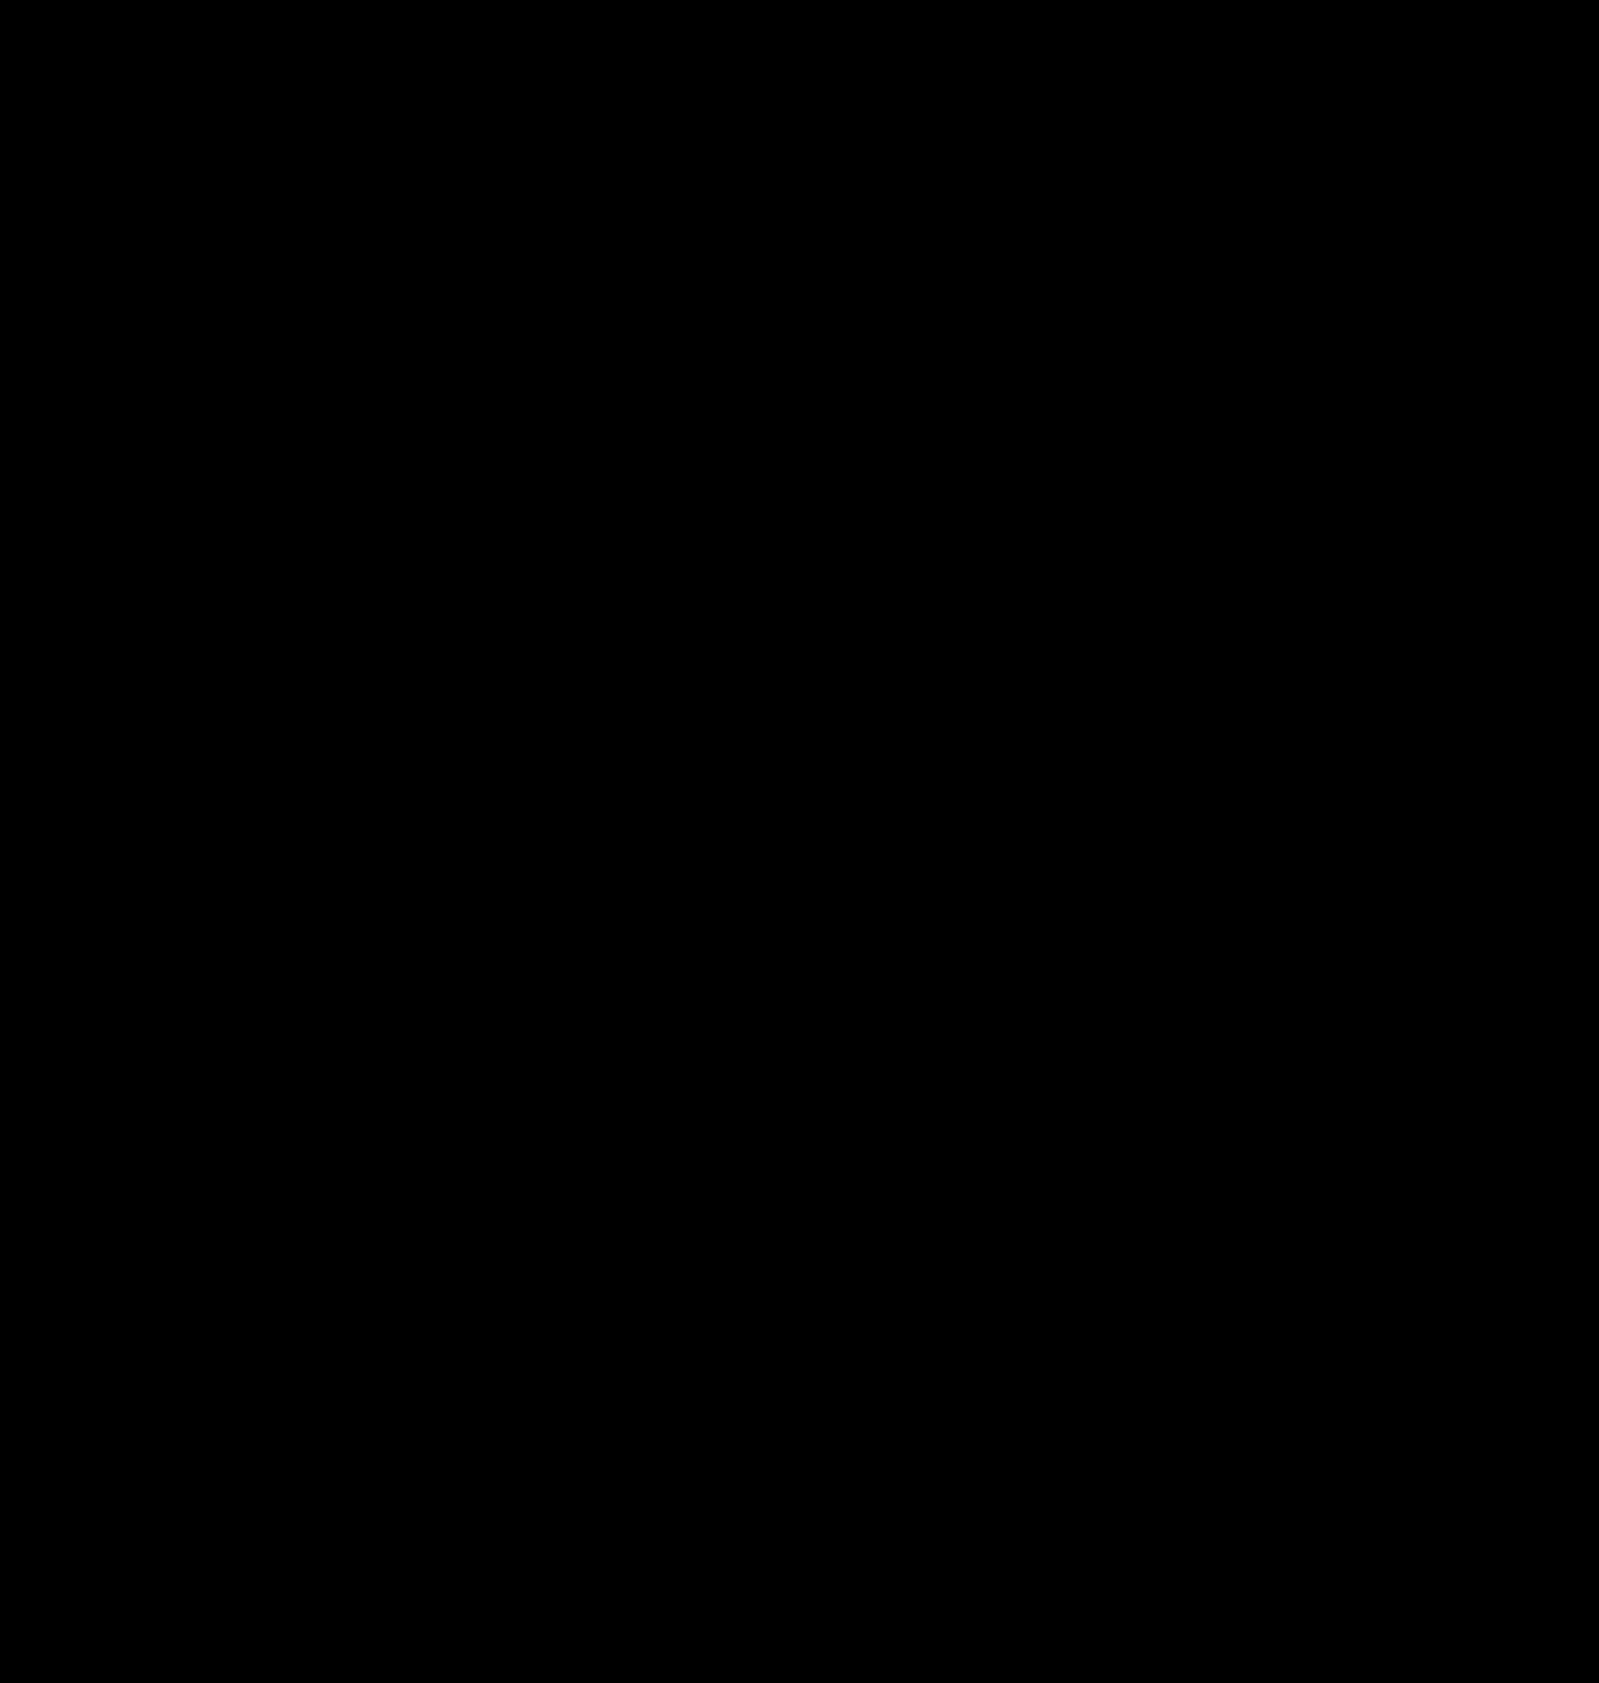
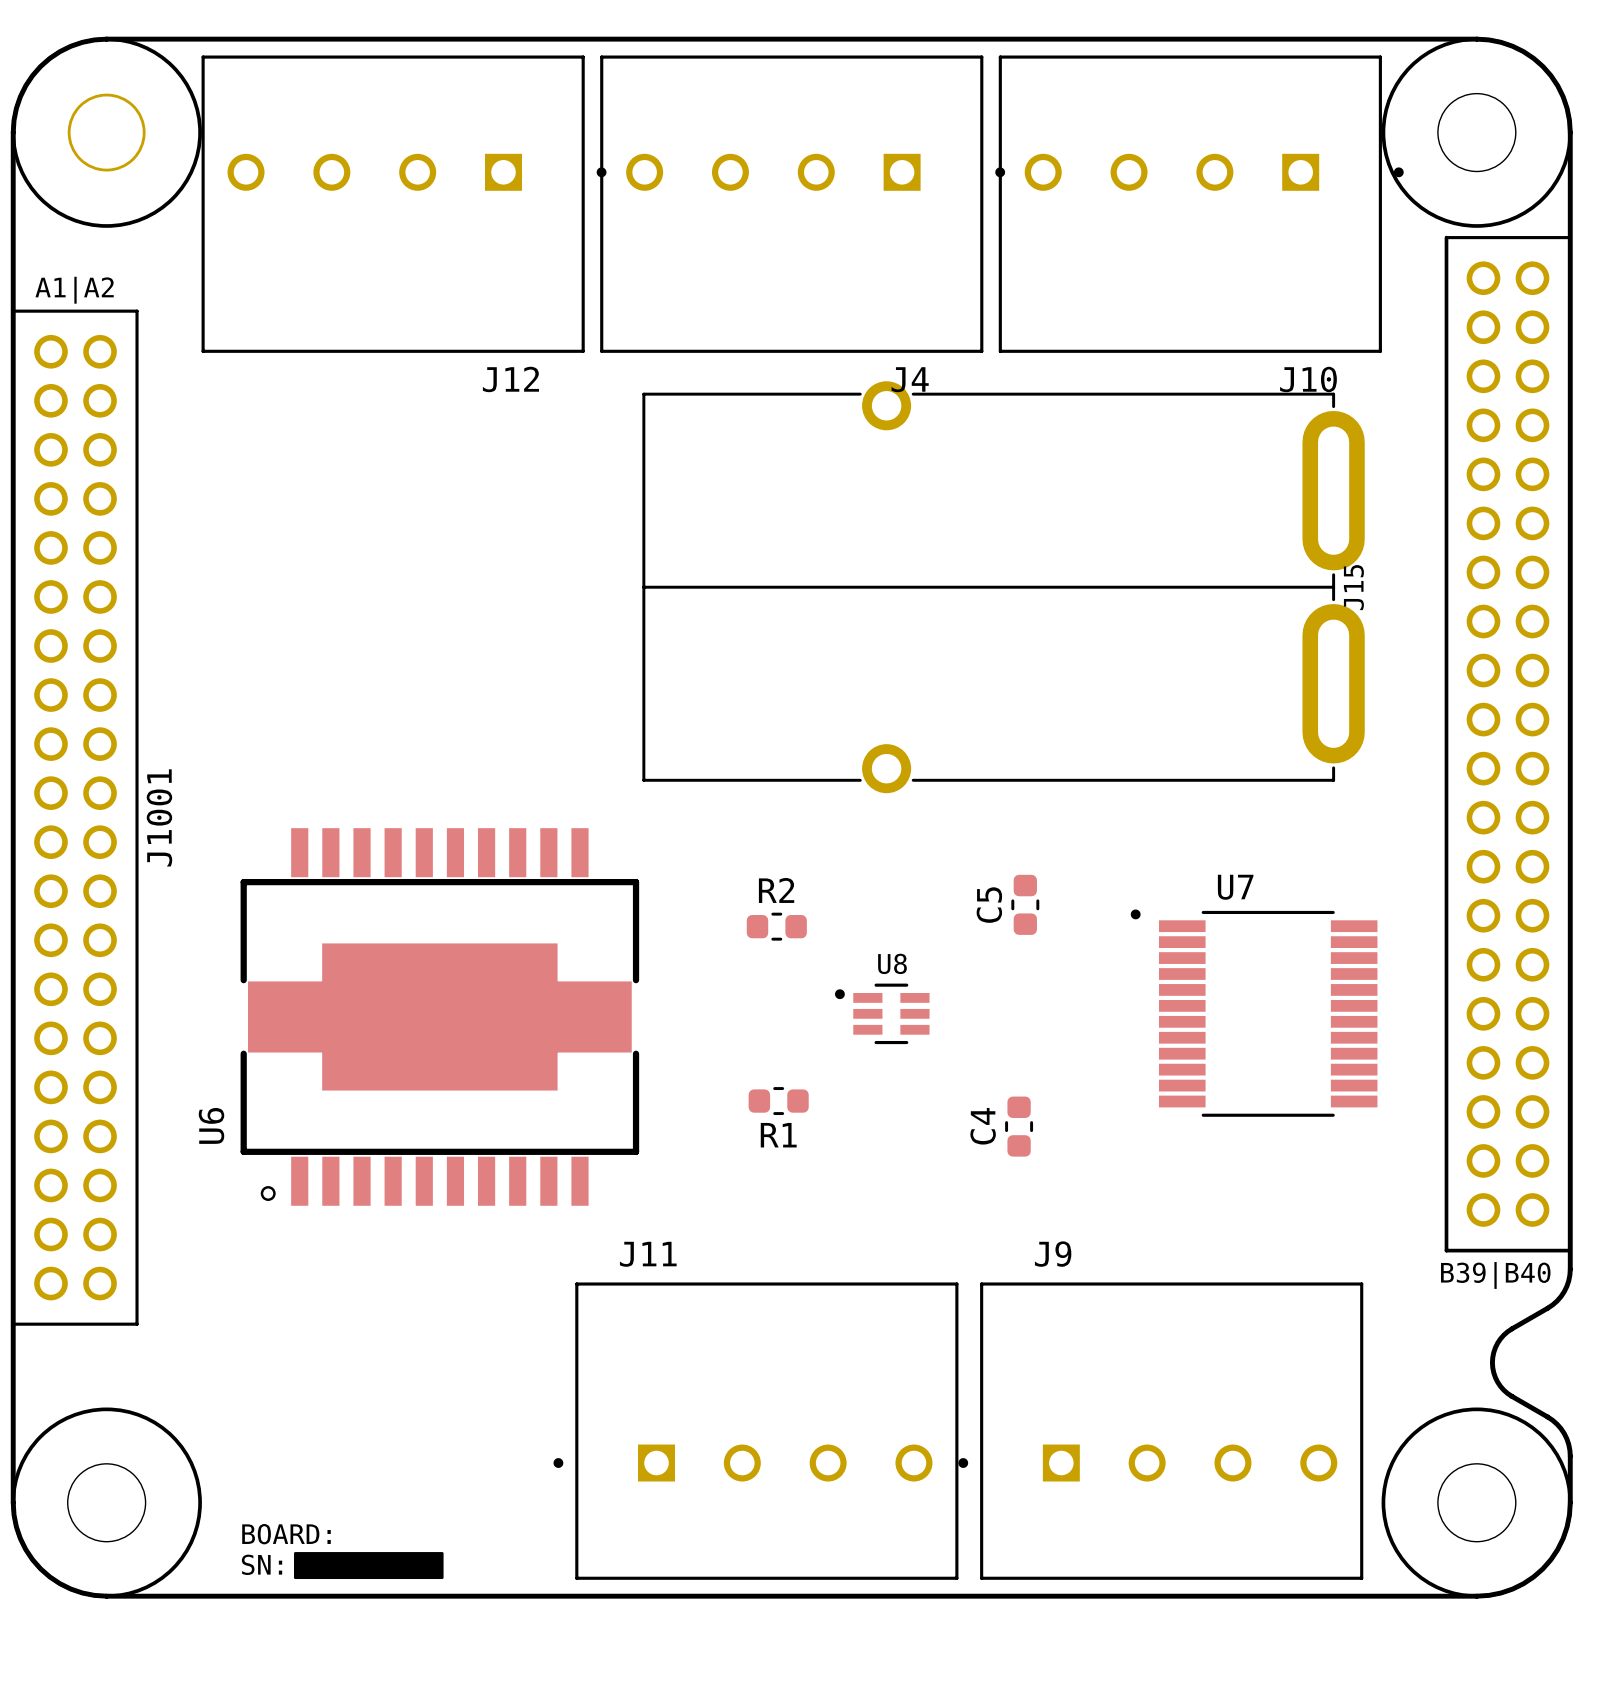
J12: none -> (404, 204)
J4: none -> (802, 204)
J10: none -> (1201, 204)
J15: none -> (1003, 587)
J1001: none -> (791, 817)
C5: none -> (1025, 904)
R2: none -> (776, 926)
U8: none -> (882, 1013)
U7: none -> (1254, 1013)
U6: none -> (439, 1016)
R1: none -> (778, 1101)
C4: none -> (1019, 1126)
J11: none -> (755, 1431)
J9: none -> (1160, 1431)

